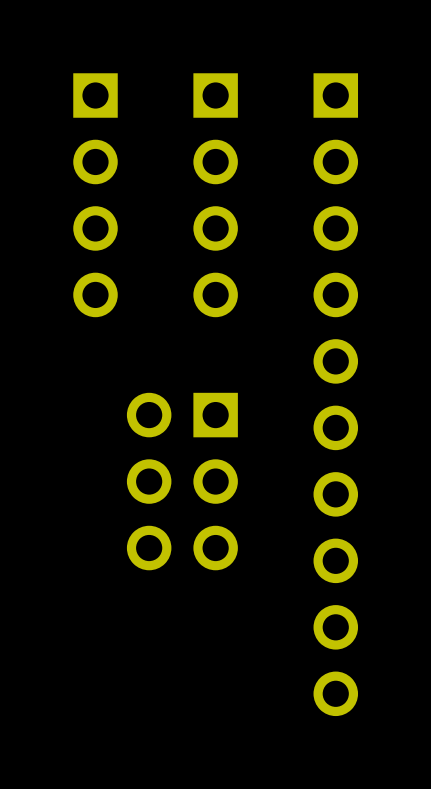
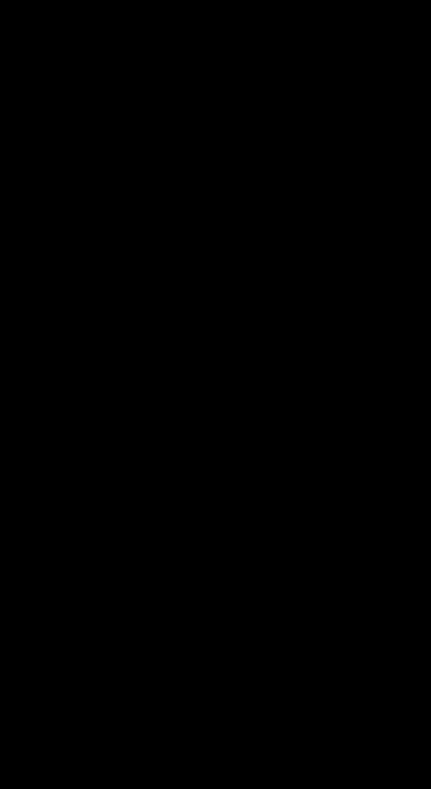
part: (95, 195) -> none
part: (215, 195) -> none
part: (335, 394) -> none
part: (182, 481) -> none

